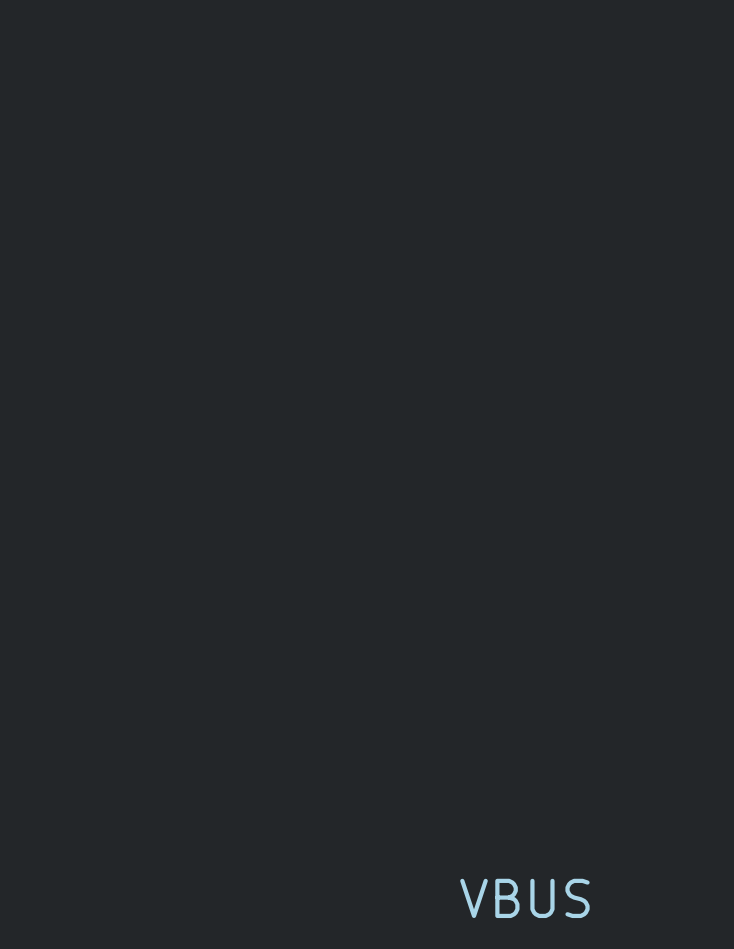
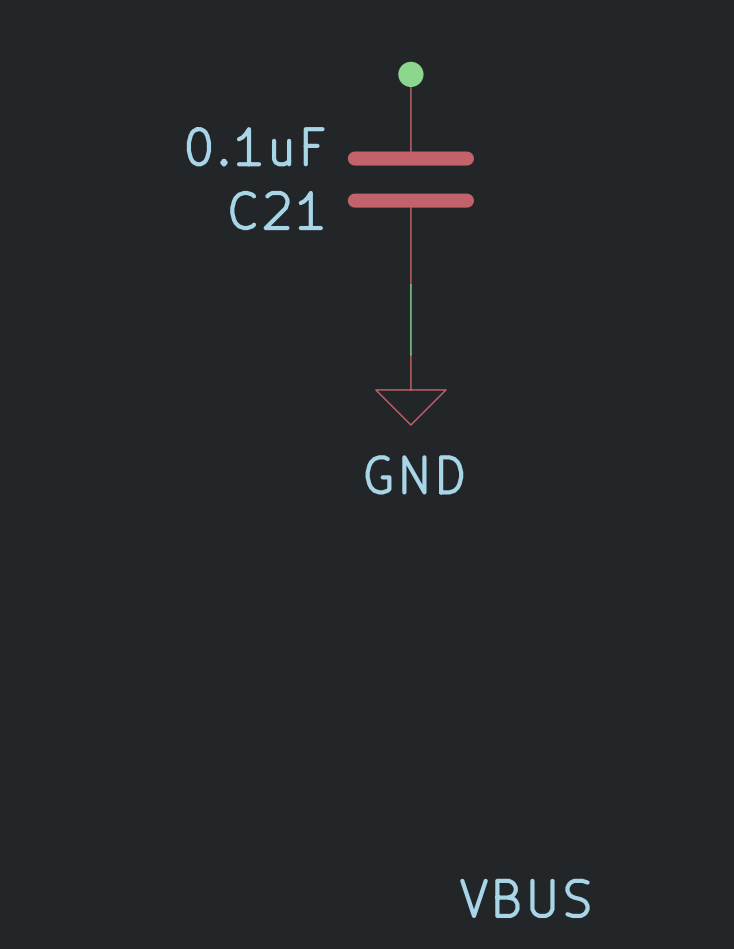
junction: none -> (410, 74)
C21: none -> 0.1uF (410, 179)
wire: none -> (410, 284) (410, 354)
power symbol: none -> GND (410, 389)

